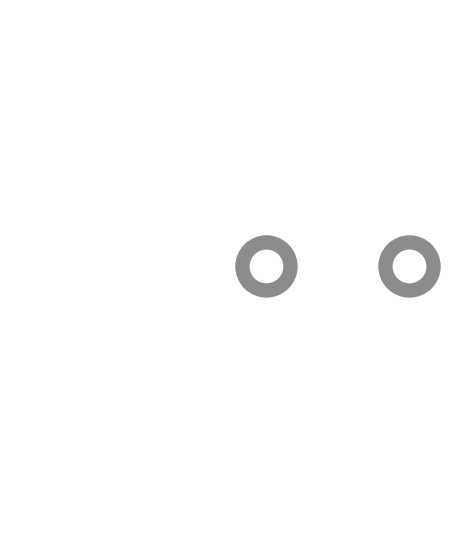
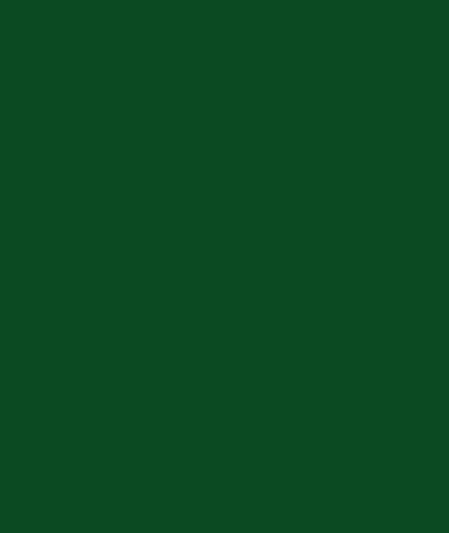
part: (337, 266) -> none

